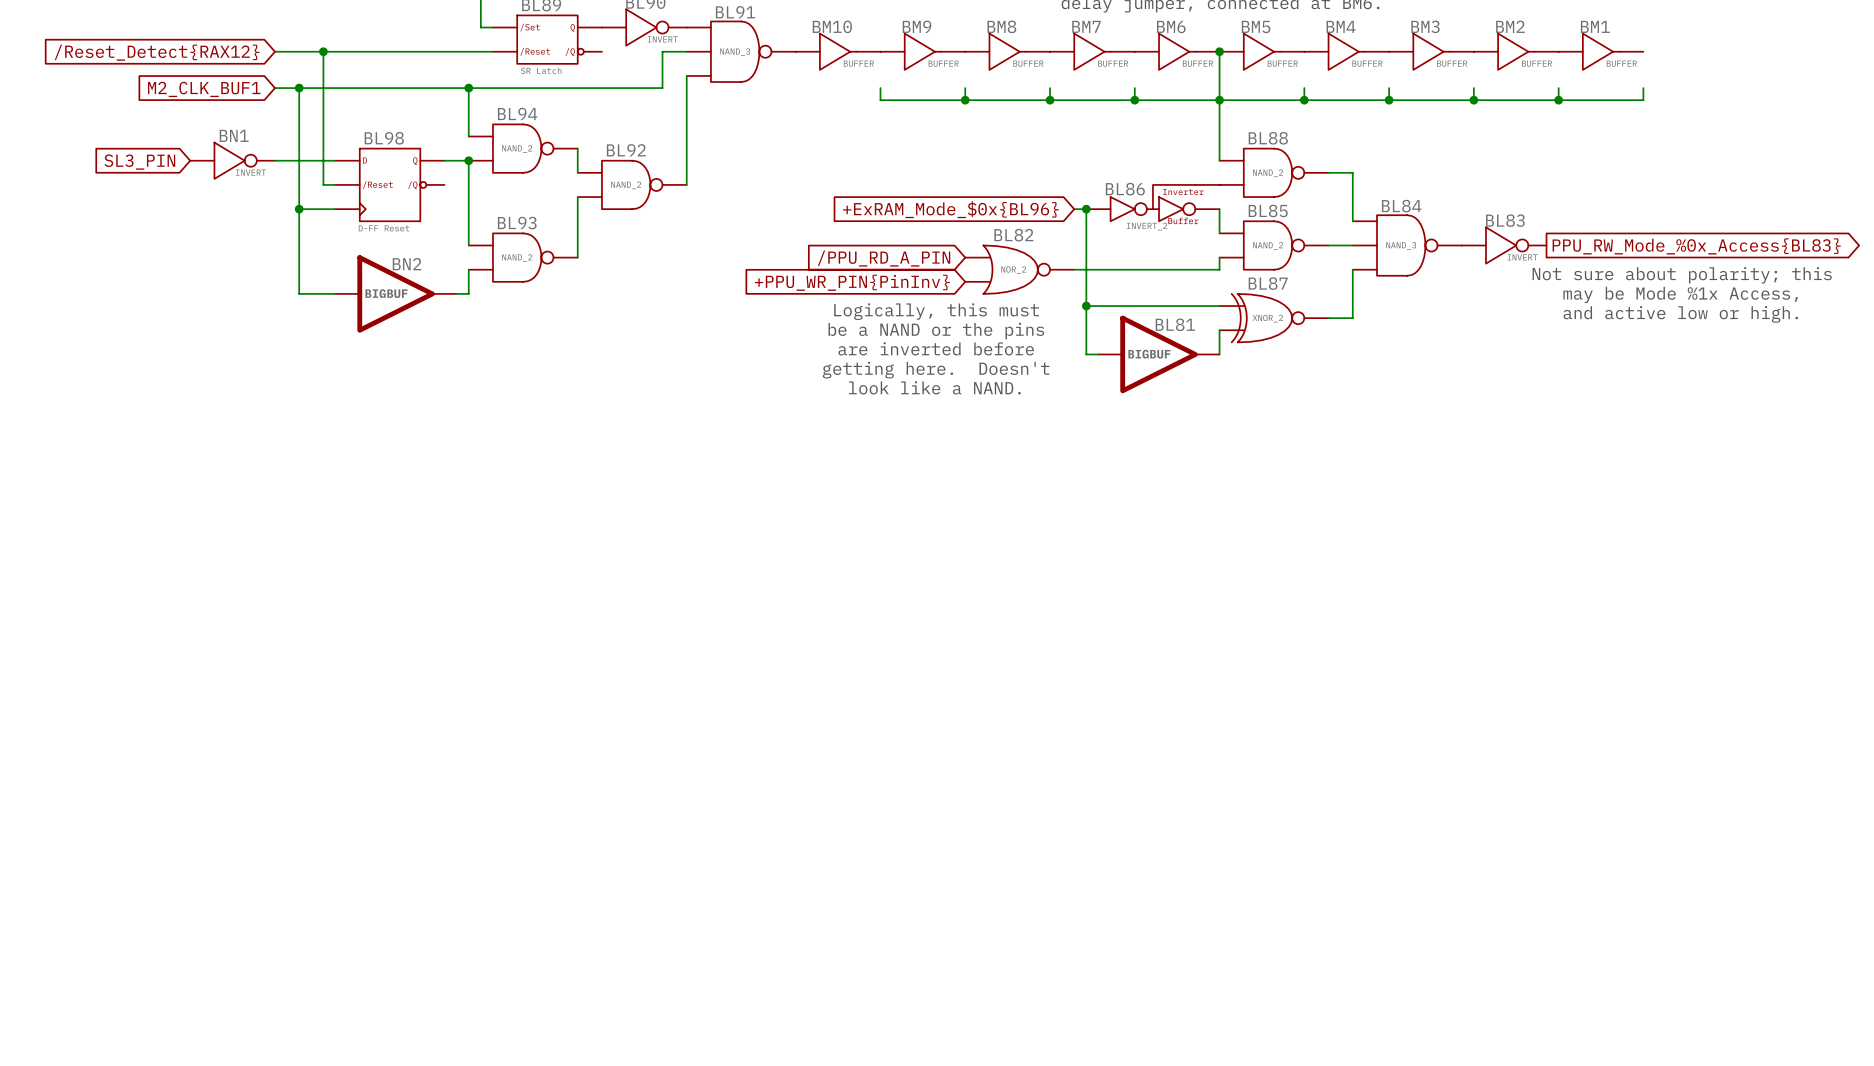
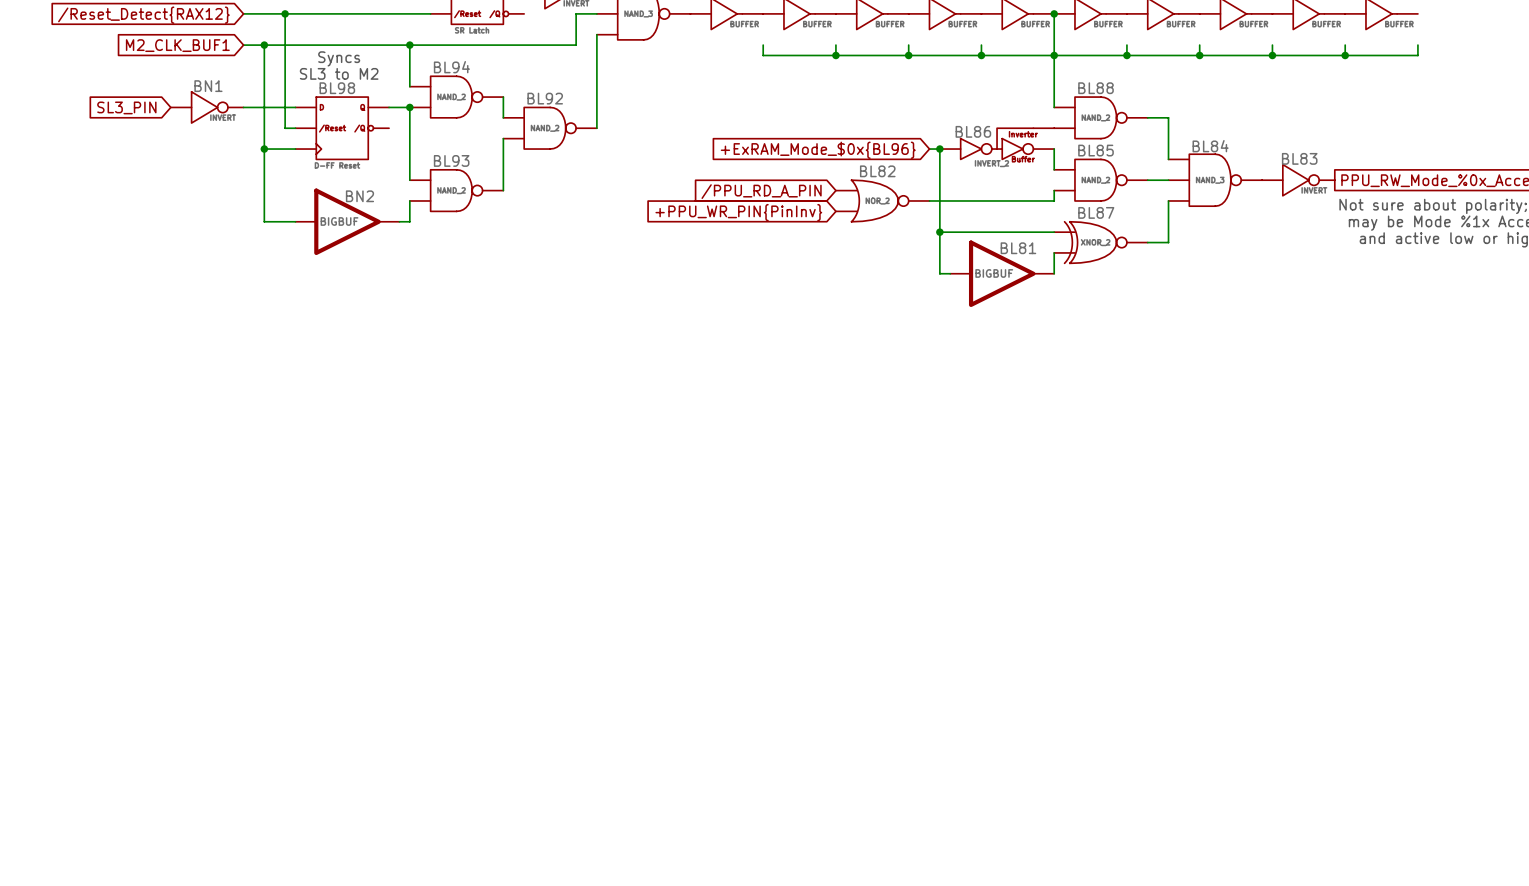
text: none -> Syncs (339, 58)
text: none -> SL3 to M2 (339, 73)
text: Logically, this must (936, 311) -> none
text: be a NAND or the pins (936, 331) -> none
text: are inverted before (936, 348) -> none
text: getting here. Doesn't (936, 370) -> none
text: look like a NAND. (934, 387) -> none

